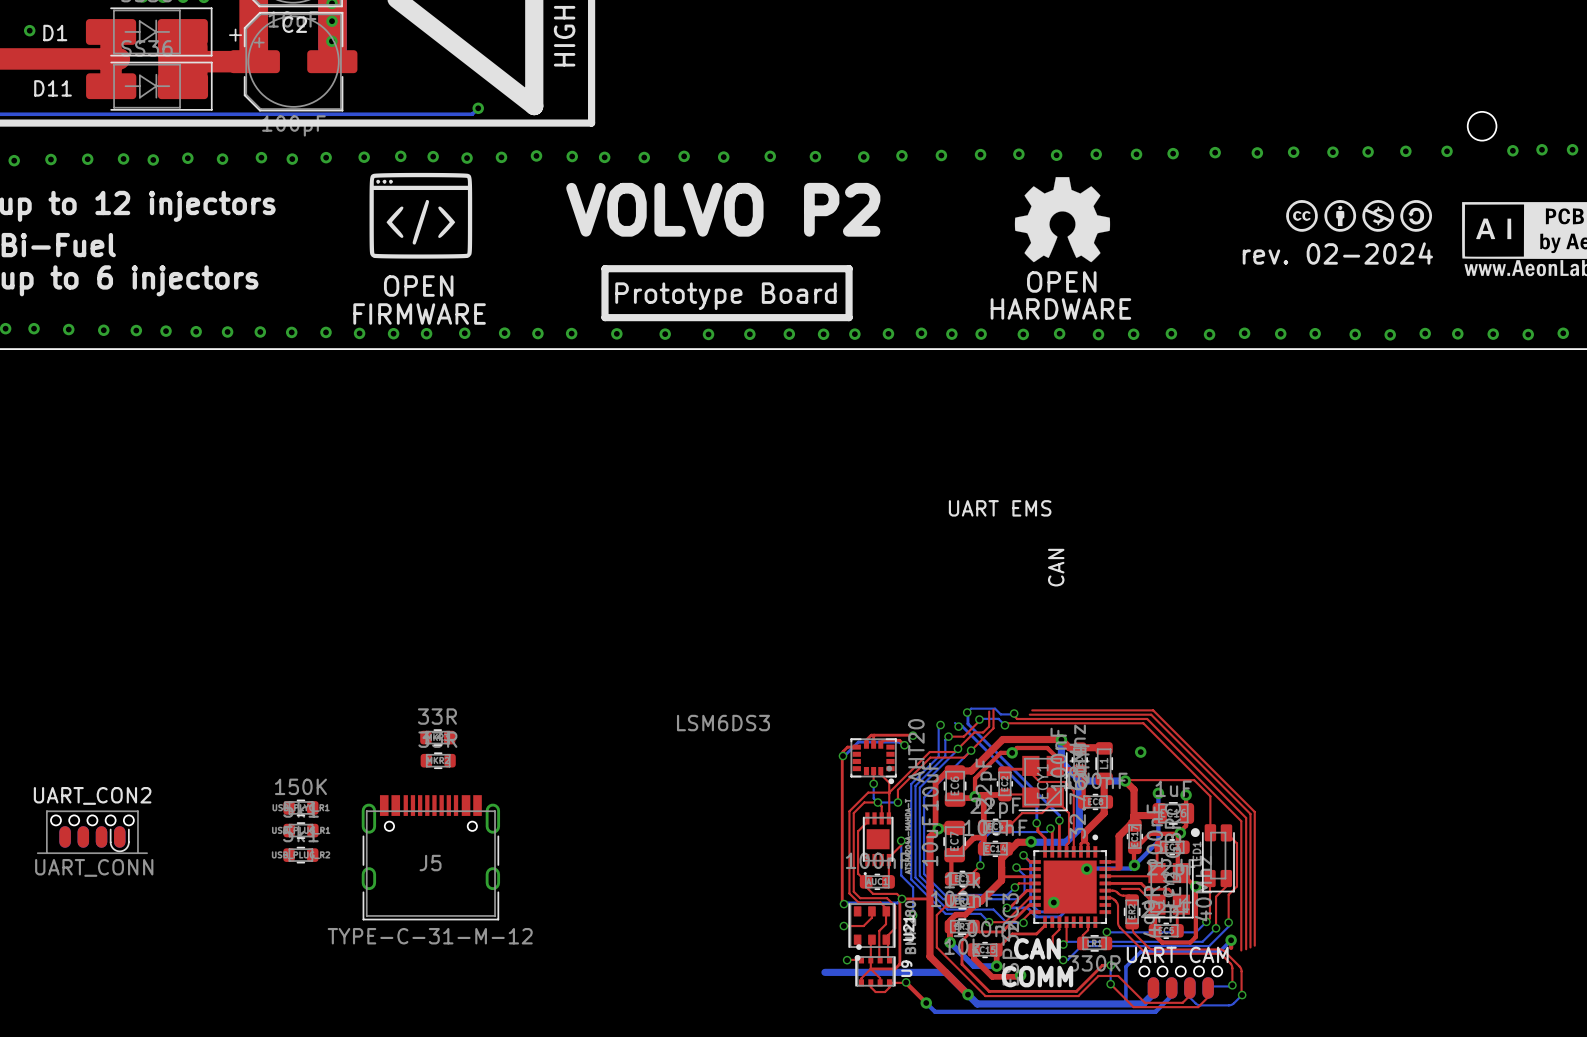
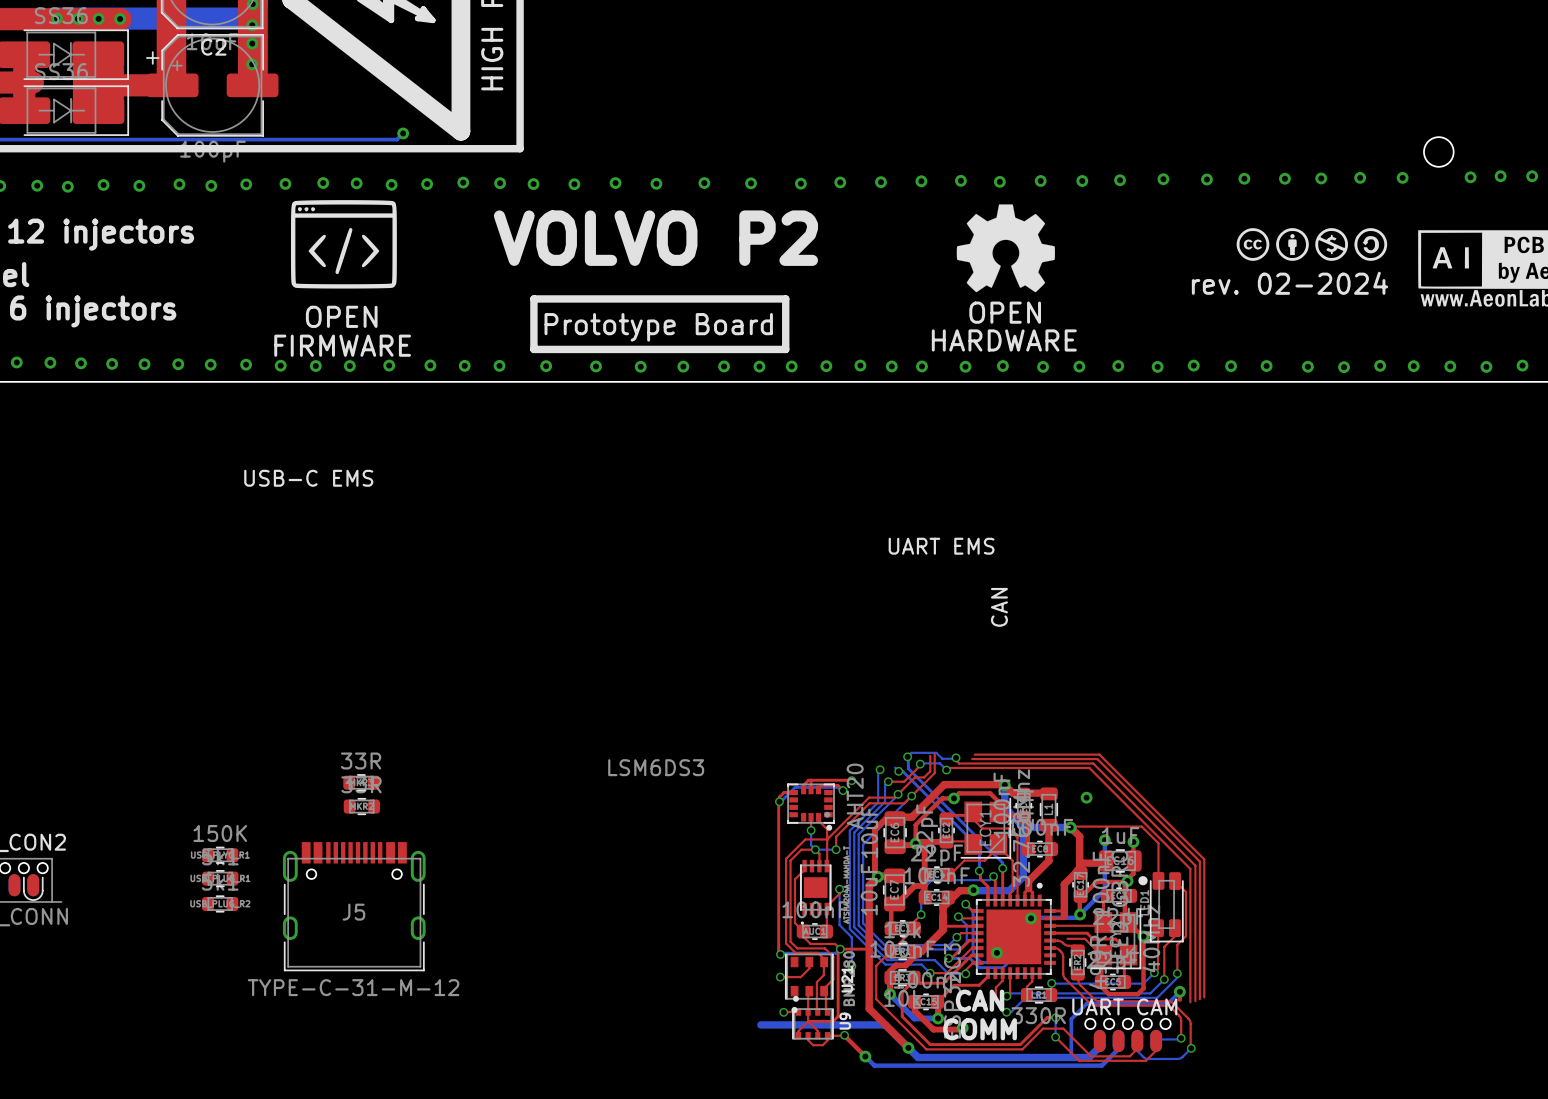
text: none -> USB-C EMS (308, 478)

